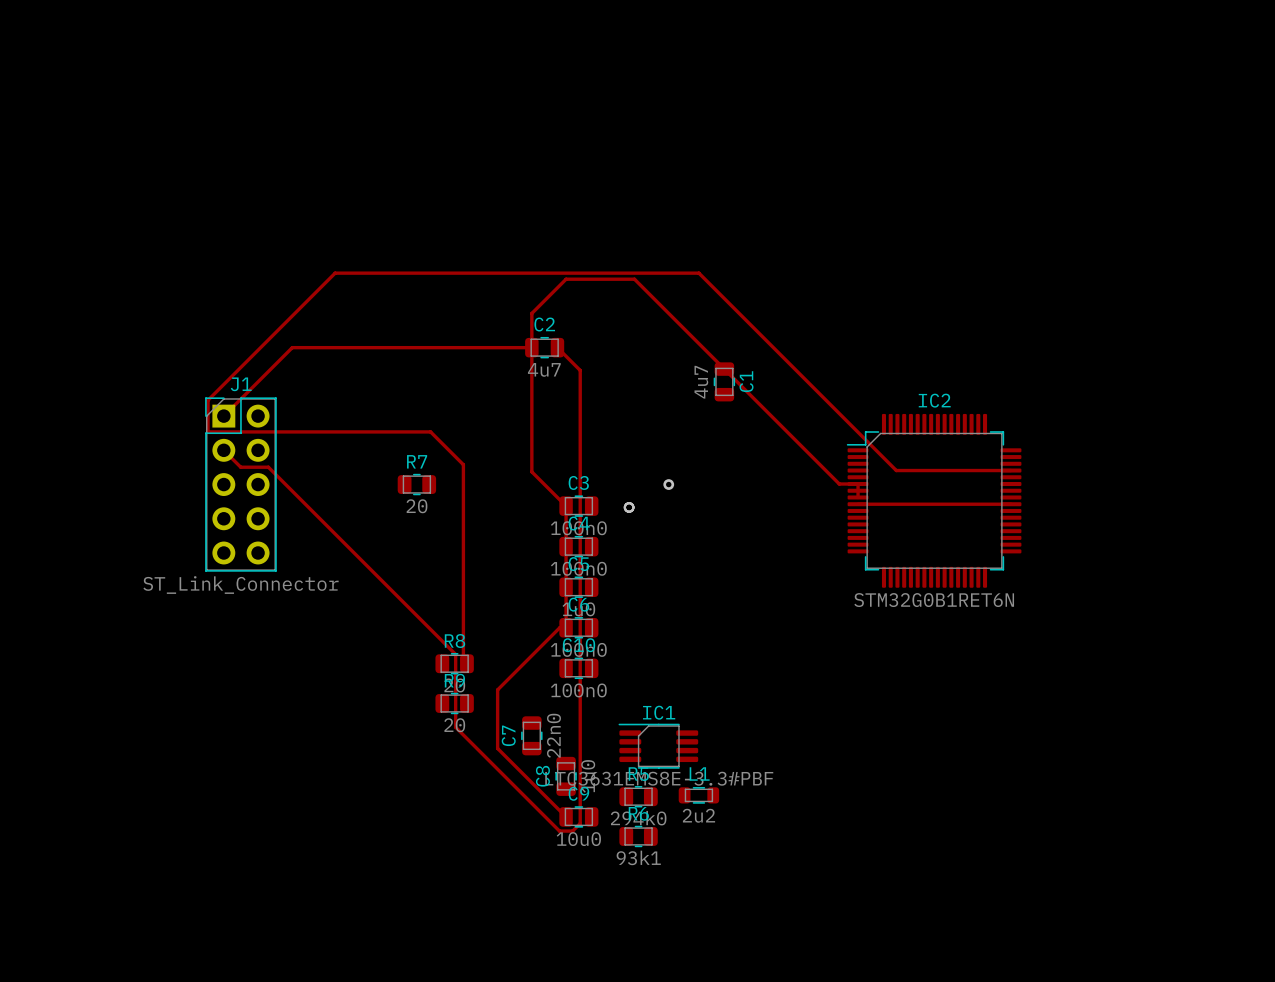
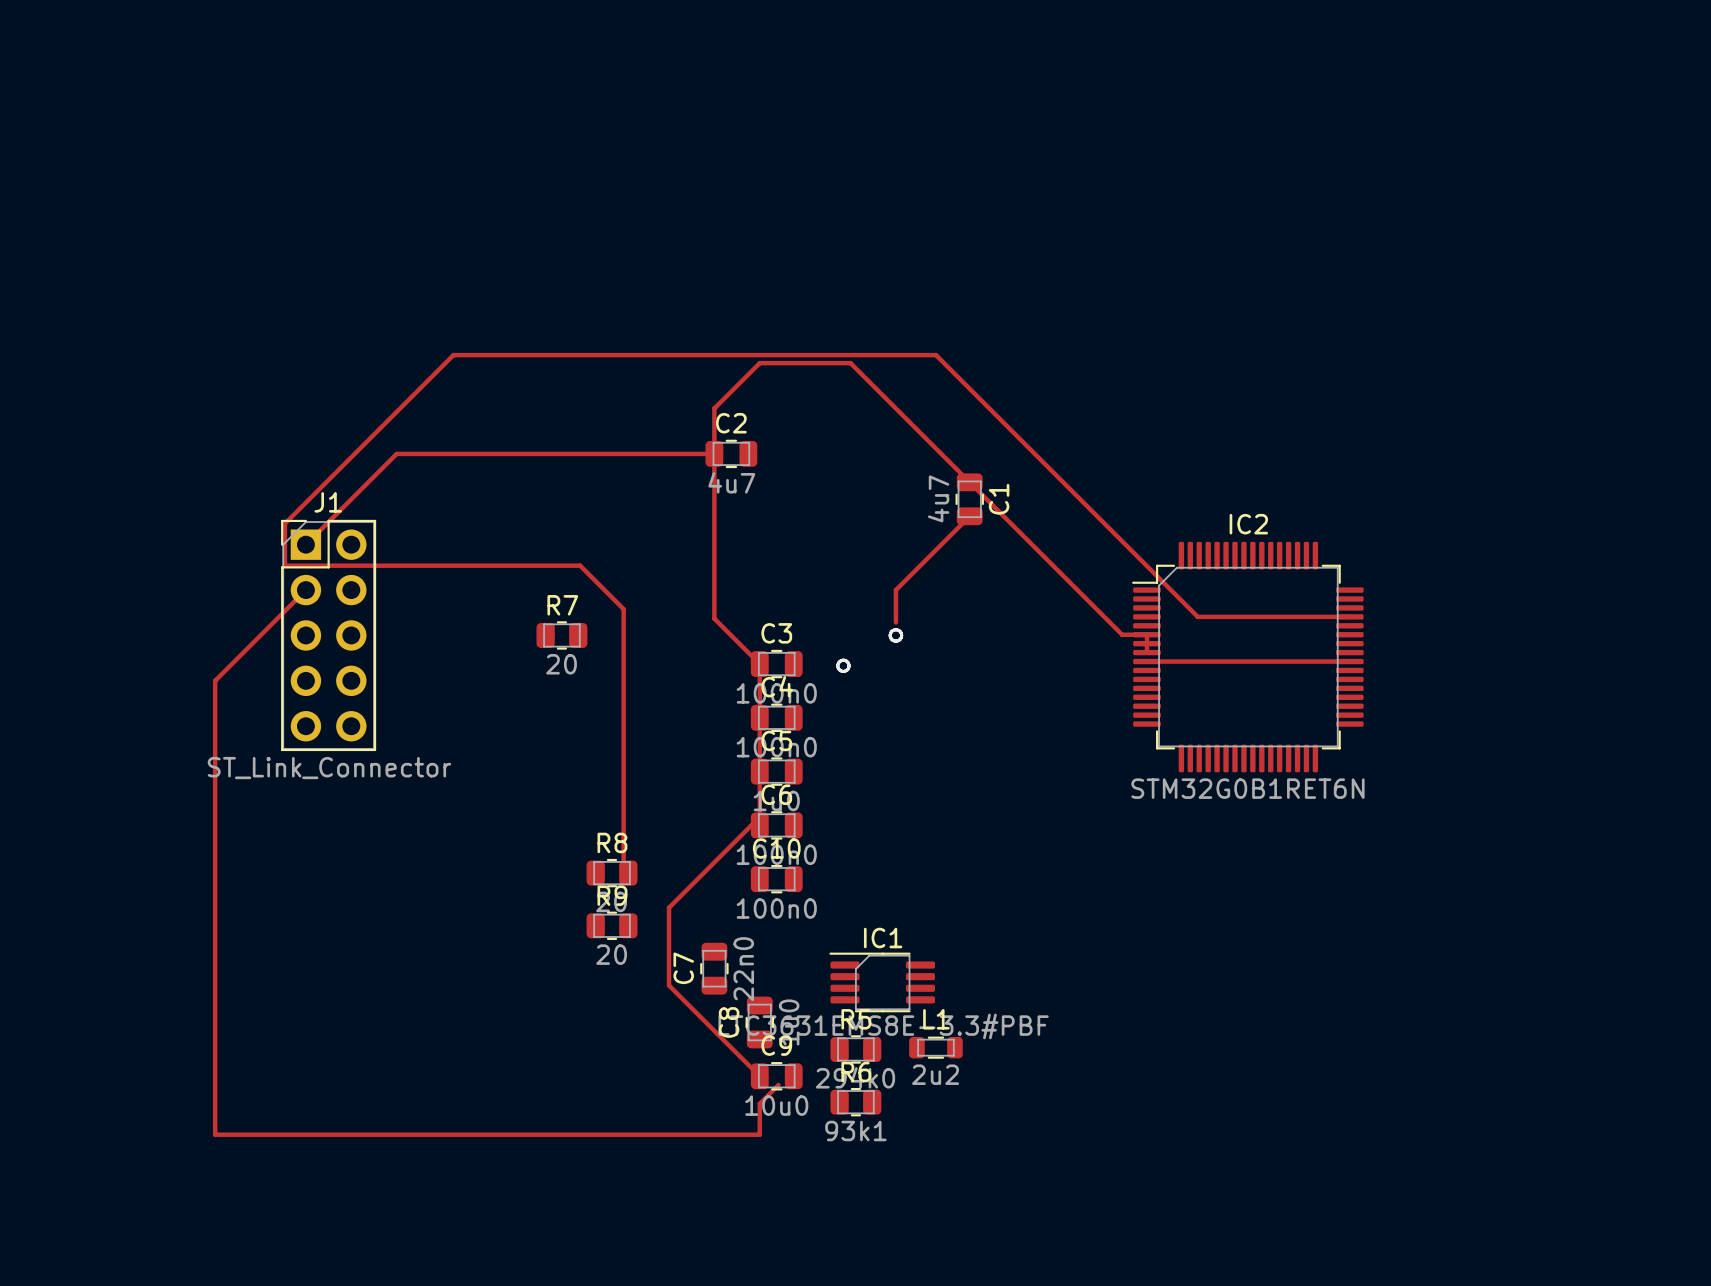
top track: (557, 347) (580, 370) (580, 823) -> none
top track: none -> (969, 516) (895, 590) (895, 622)
top track: (223, 450) (240, 467) (268, 467) (455, 654) (455, 727) (559, 831) (572, 831) -> (305, 590) (215, 680) (215, 1134) (759, 1134) (759, 1103) (768, 1095)

